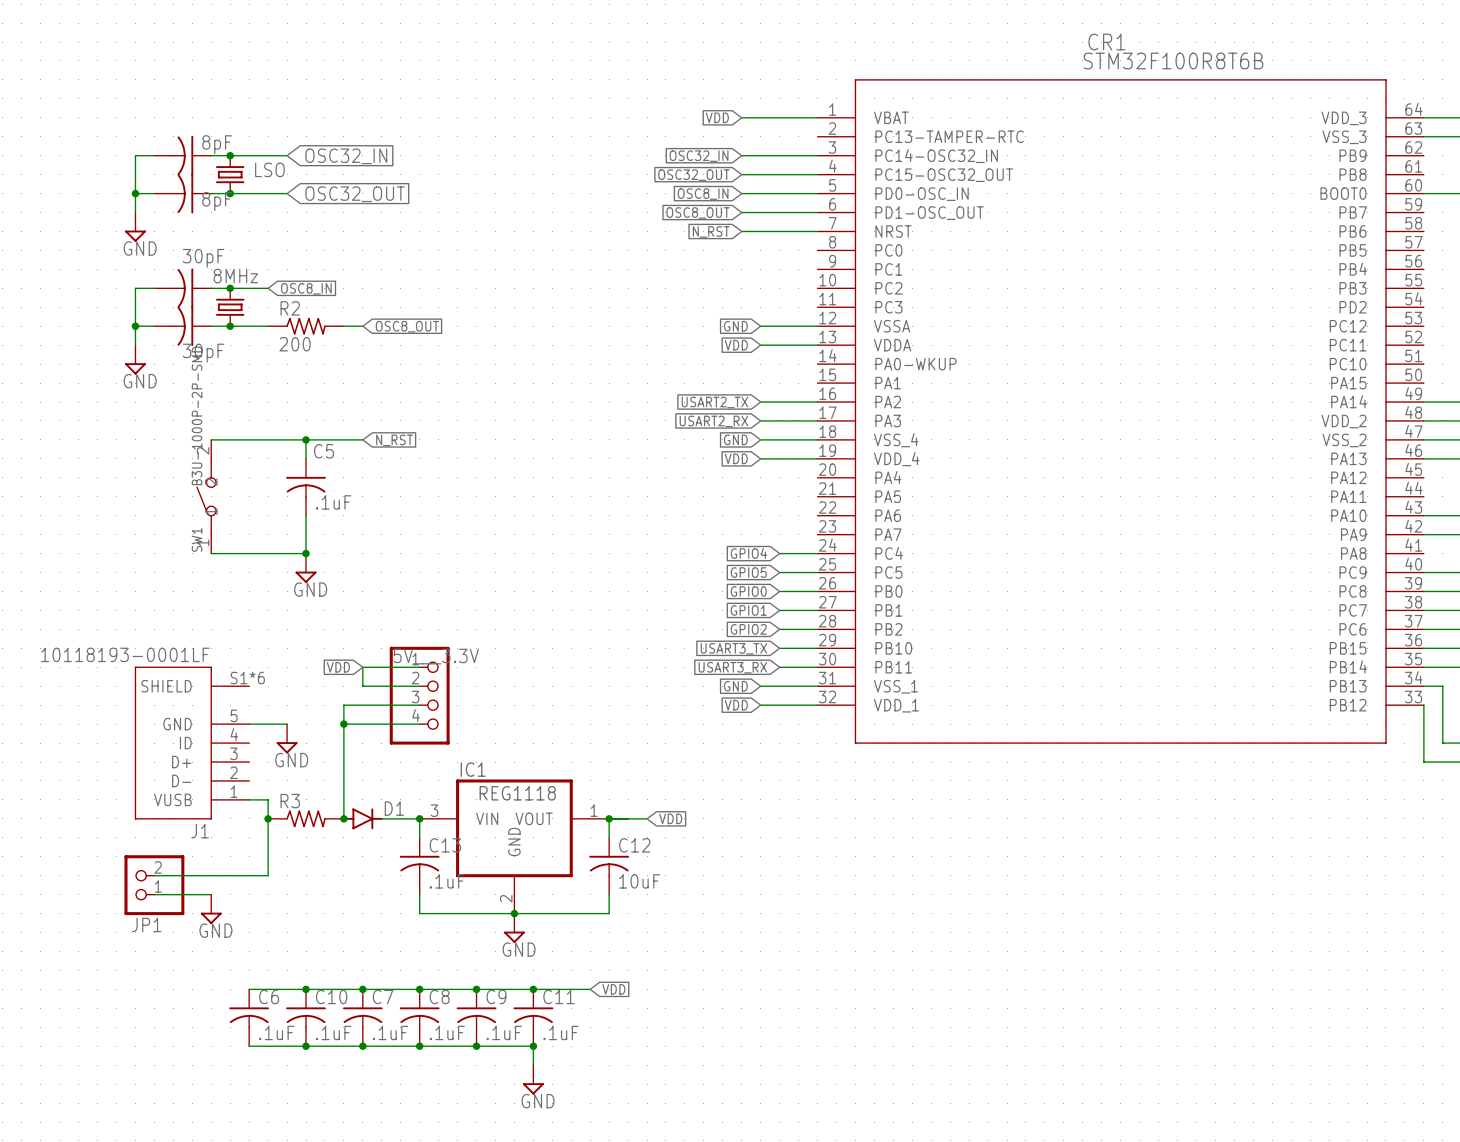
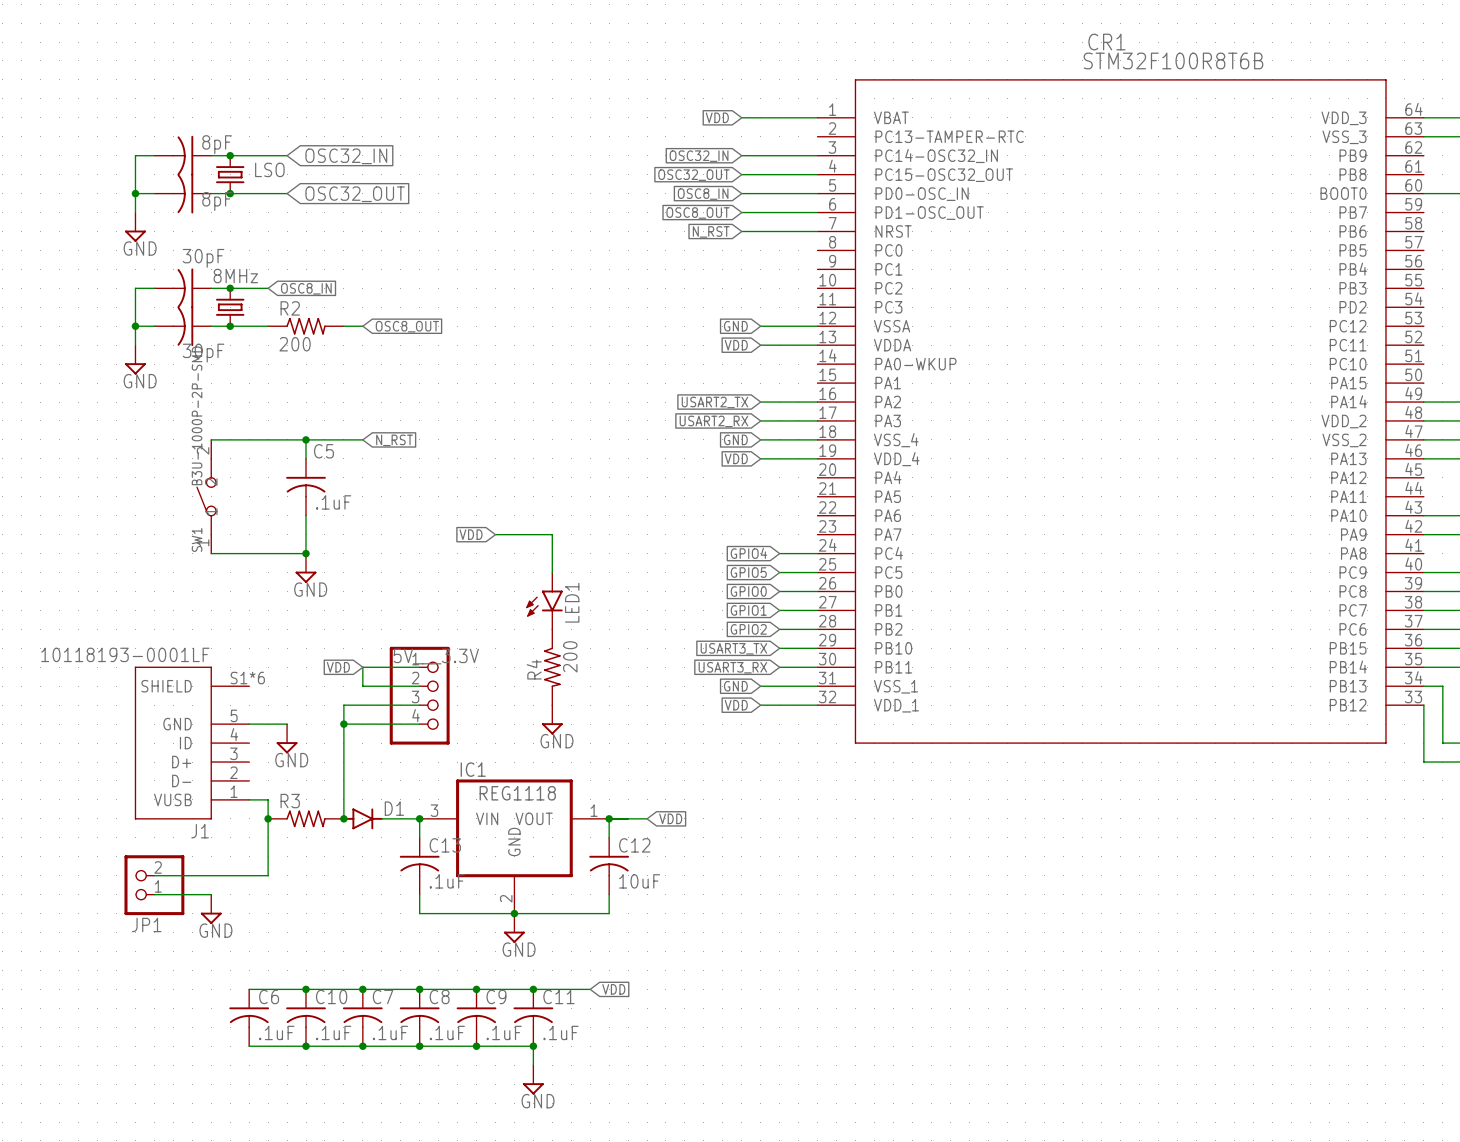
global label: none -> VDD (471, 534)
wire: none -> (495, 534) (552, 534) (552, 572)
LED1: none -> (544, 600)
R4: none -> 200 (552, 667)
power symbol: none -> GND (552, 719)

